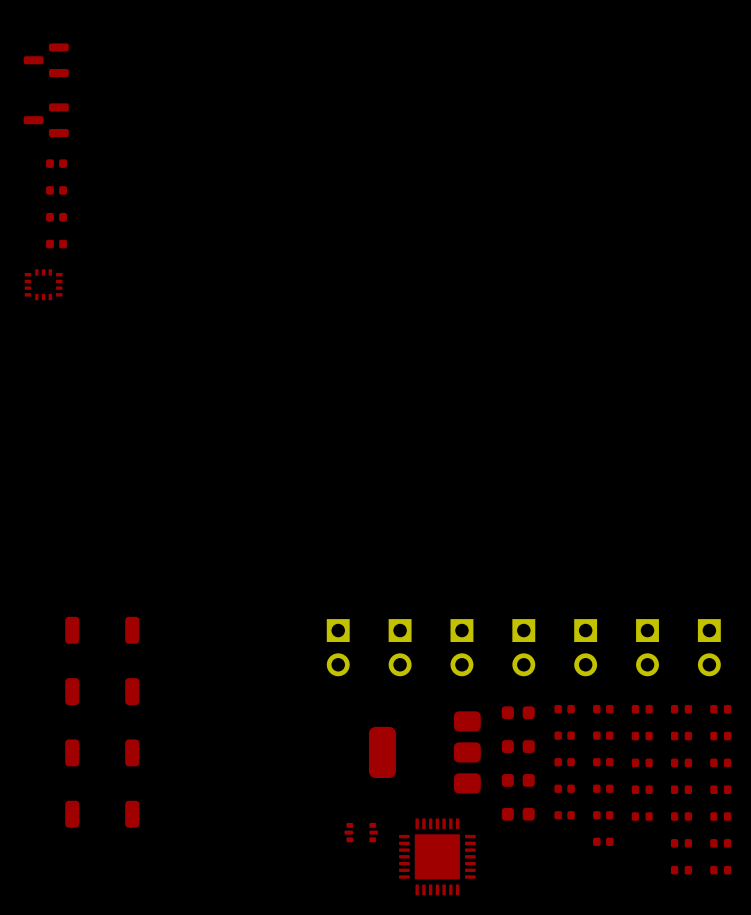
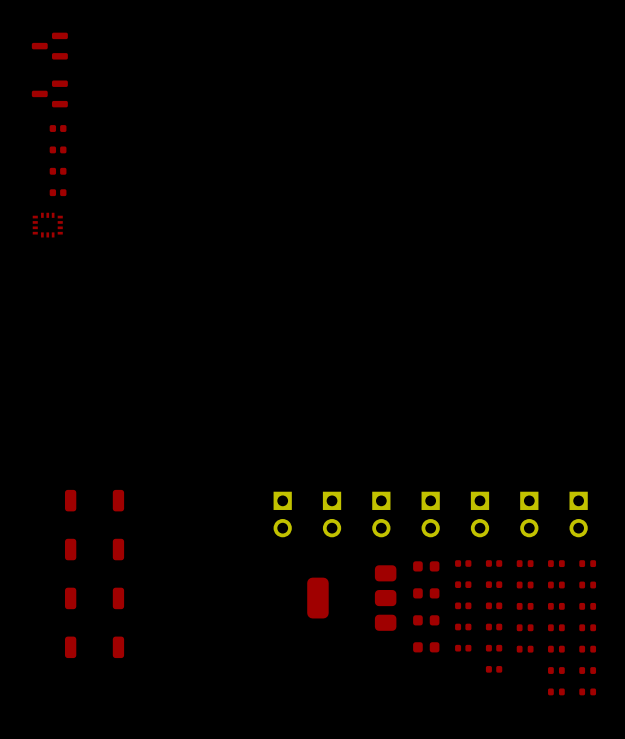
part: (361, 832) -> none
part: (437, 856) -> none

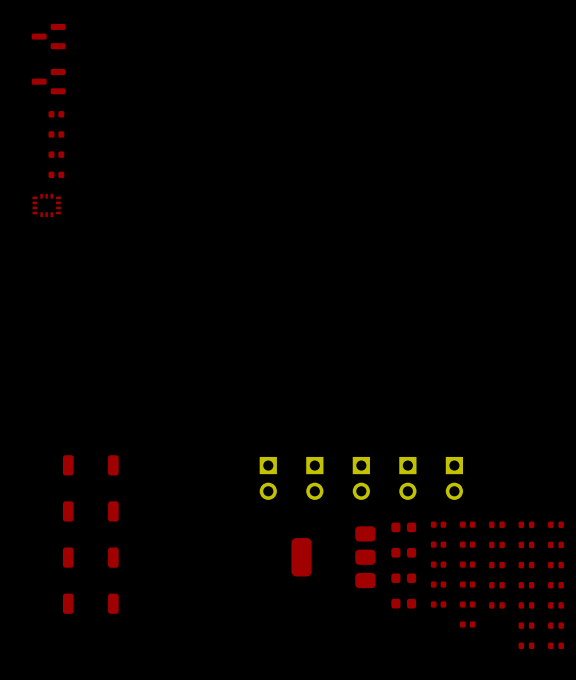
part: (529, 514) -> none
part: (578, 514) -> none

